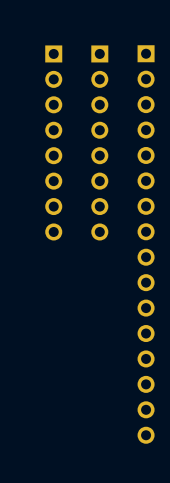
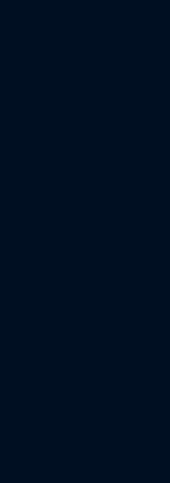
part: (53, 142) -> none
part: (99, 142) -> none
part: (146, 244) -> none

